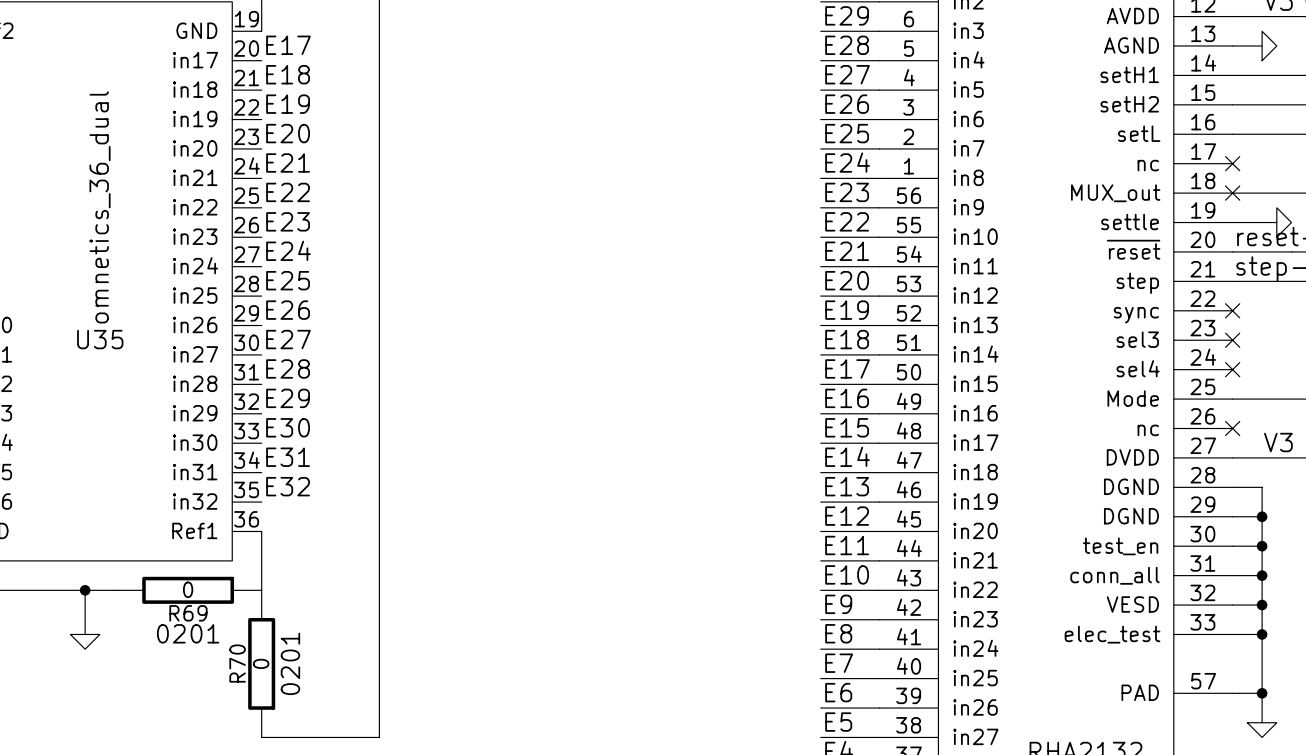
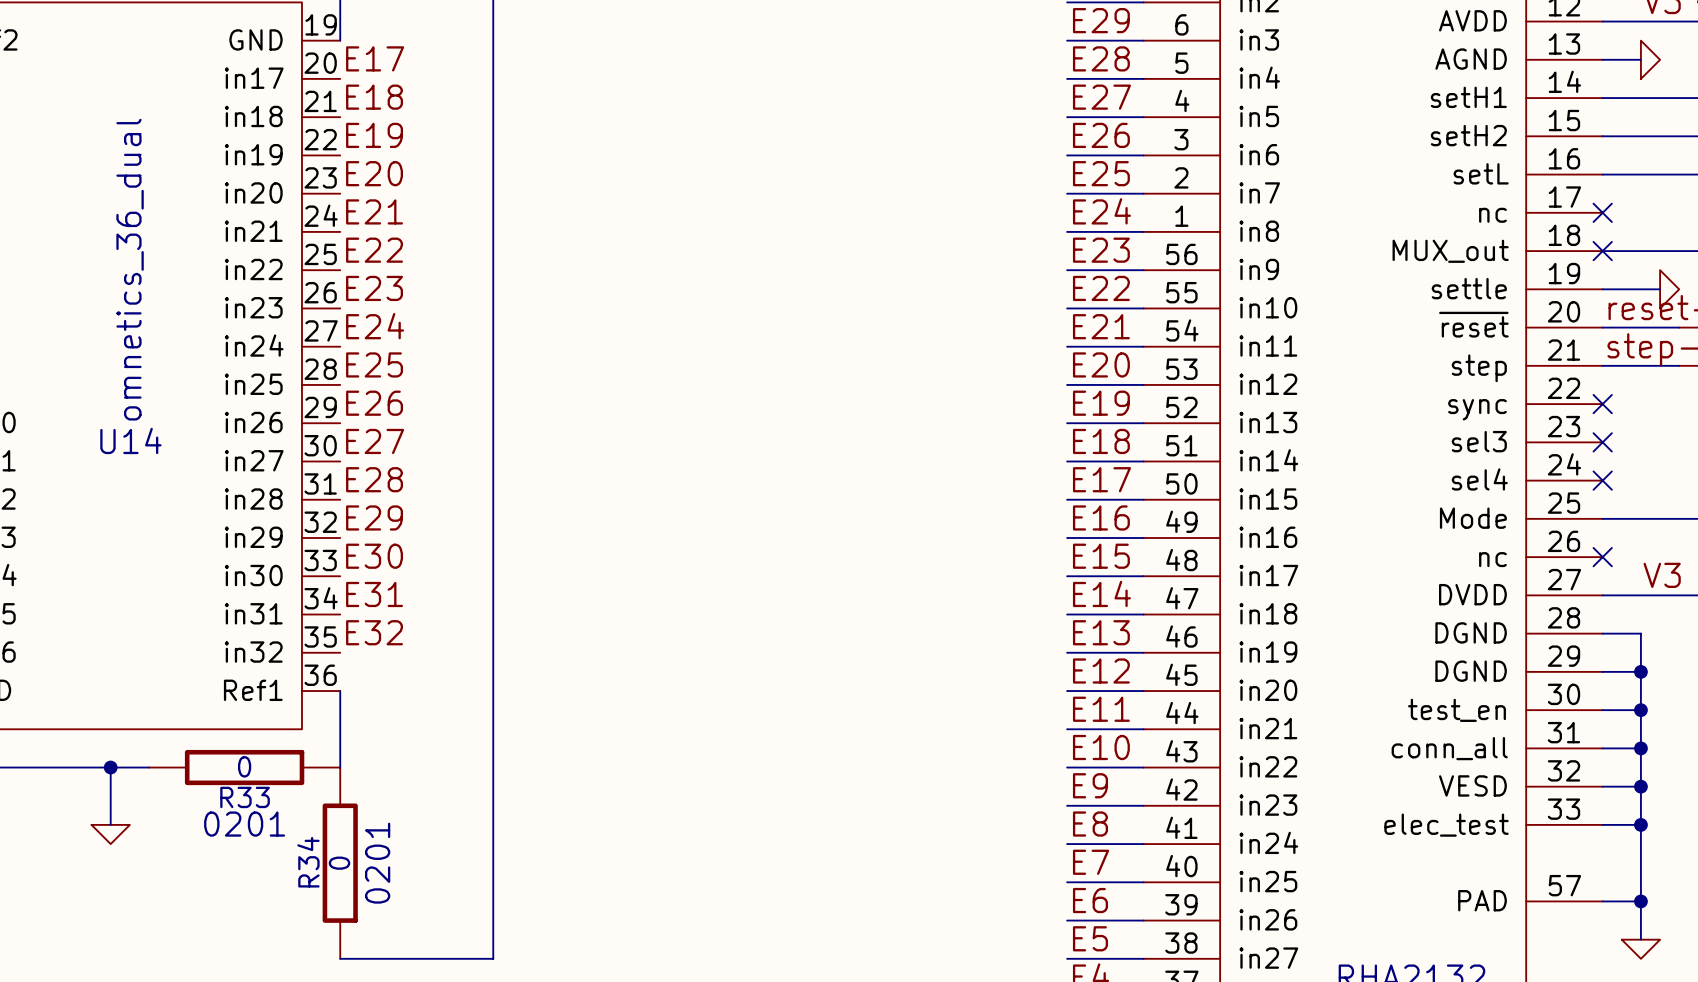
U35 name: U35 (100, 339) -> U14 (130, 440)
R69 name: R69 (188, 613) -> R33 (245, 797)
R70 name: R70 (237, 663) -> R34 (308, 862)

